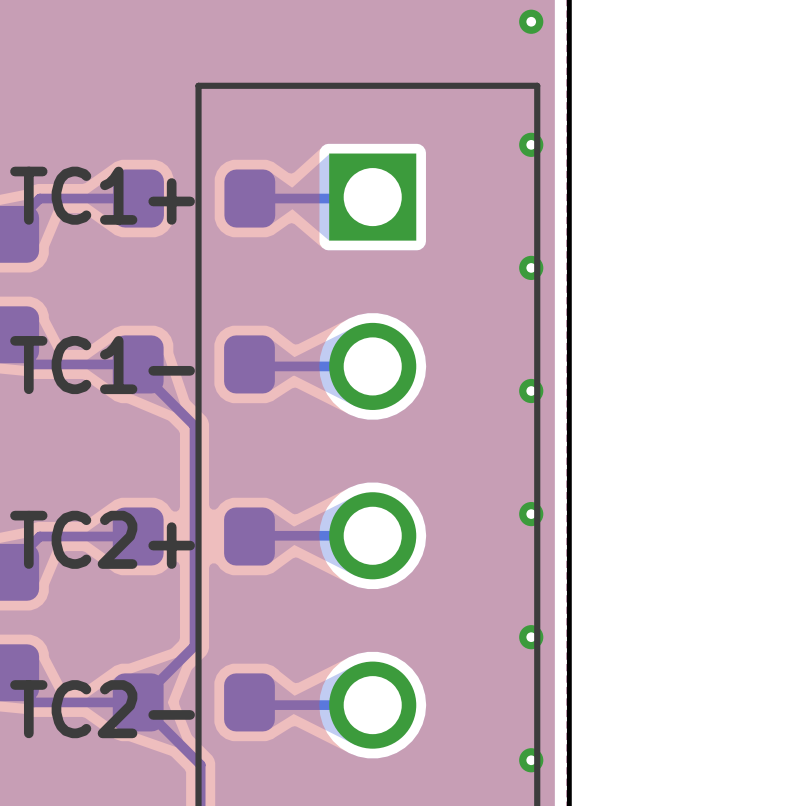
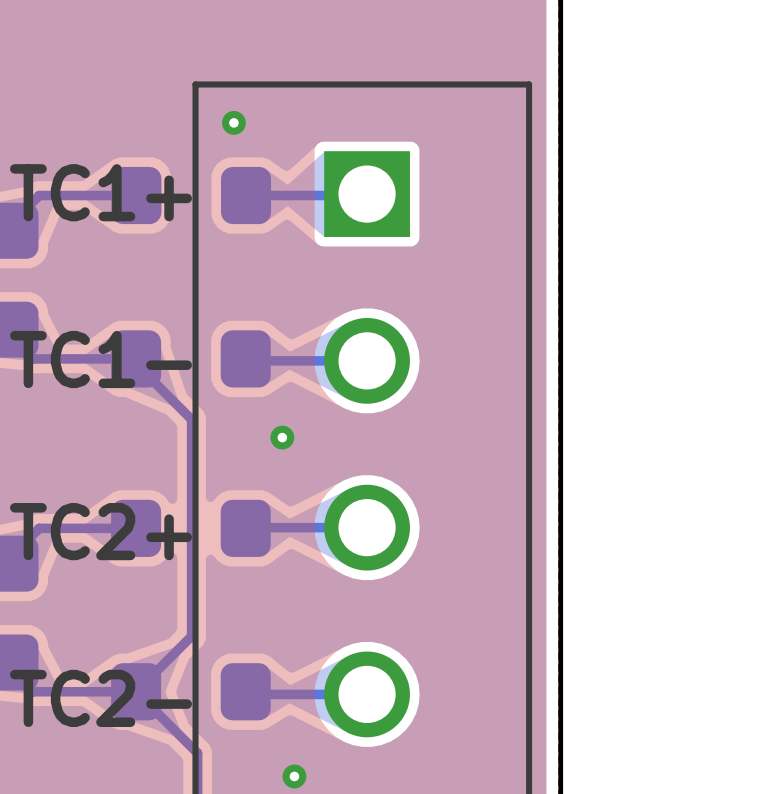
via: (531, 21) -> none
via: none -> (233, 122)
via: (531, 144) -> none
via: (531, 267) -> none
via: (531, 391) -> none
via: none -> (282, 437)
via: (531, 514) -> none
via: (531, 637) -> none
via: (531, 760) -> none
via: none -> (294, 776)

